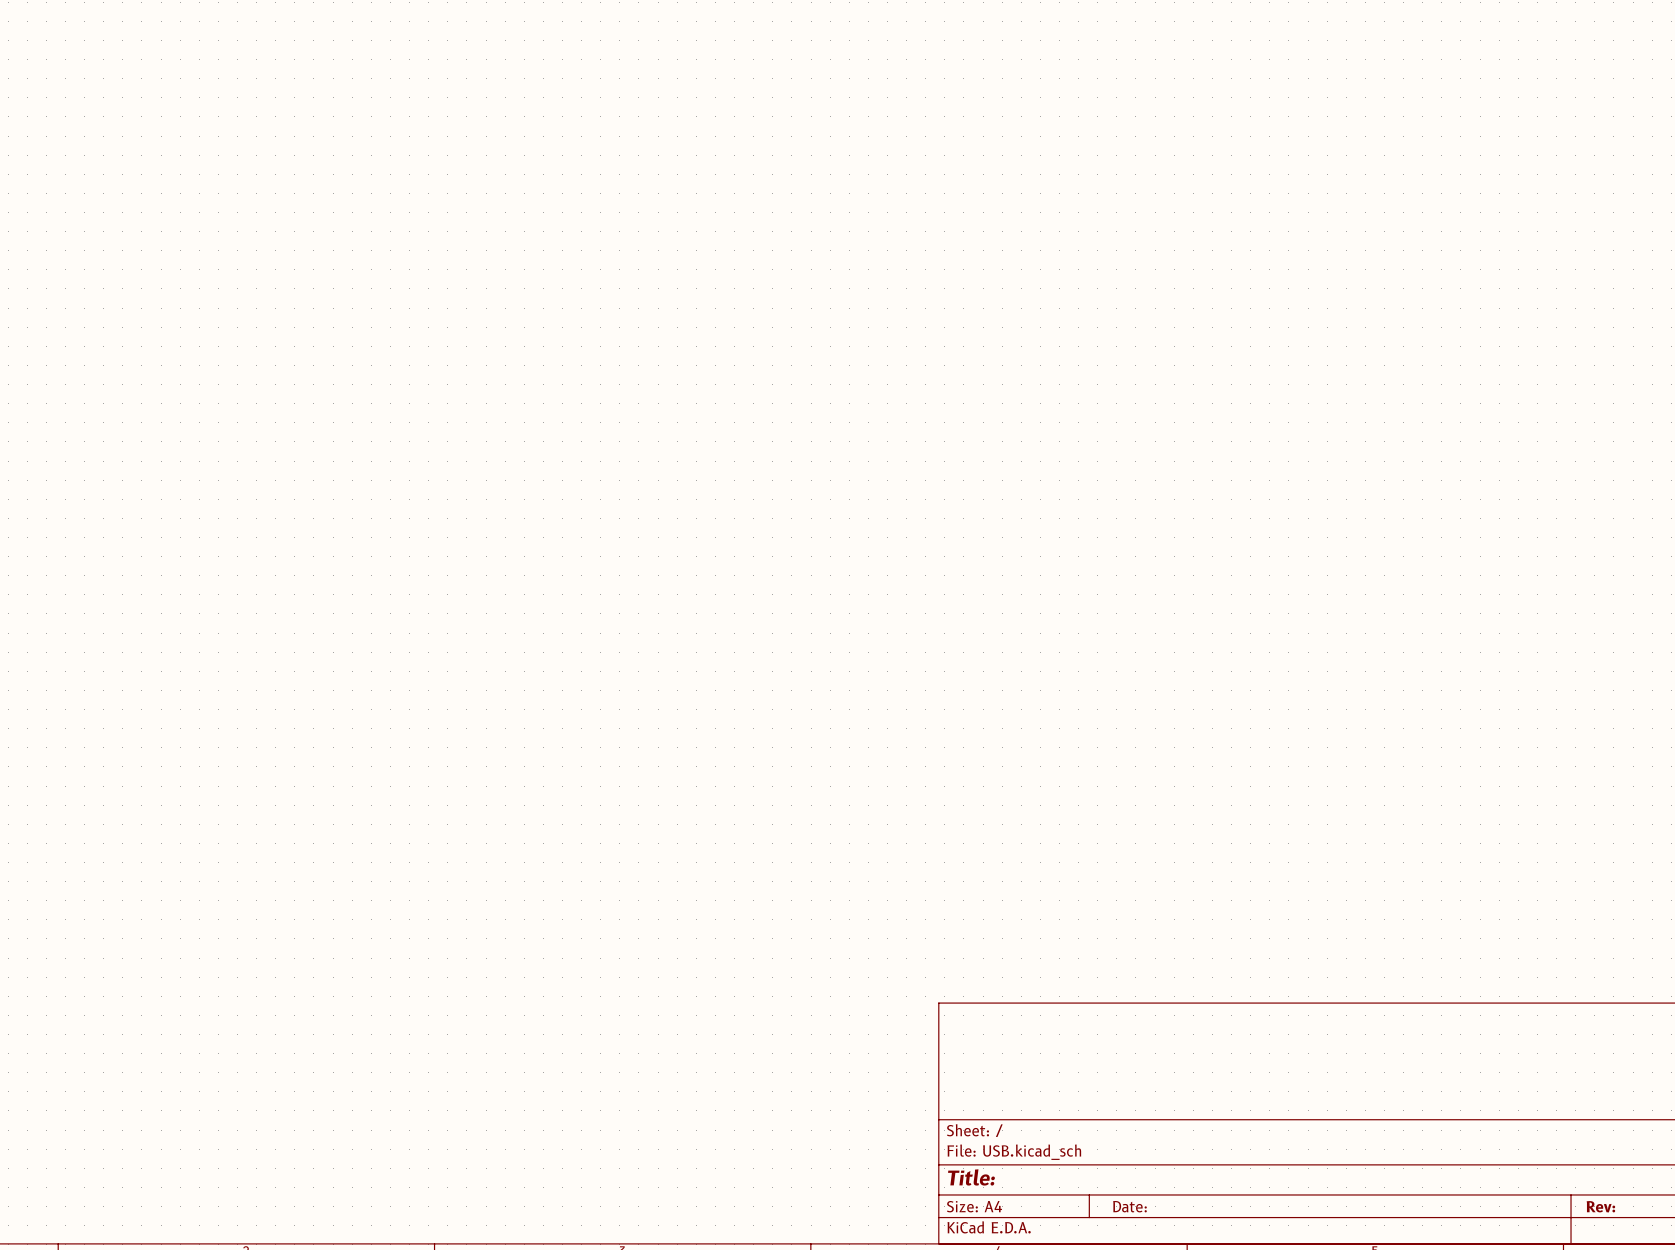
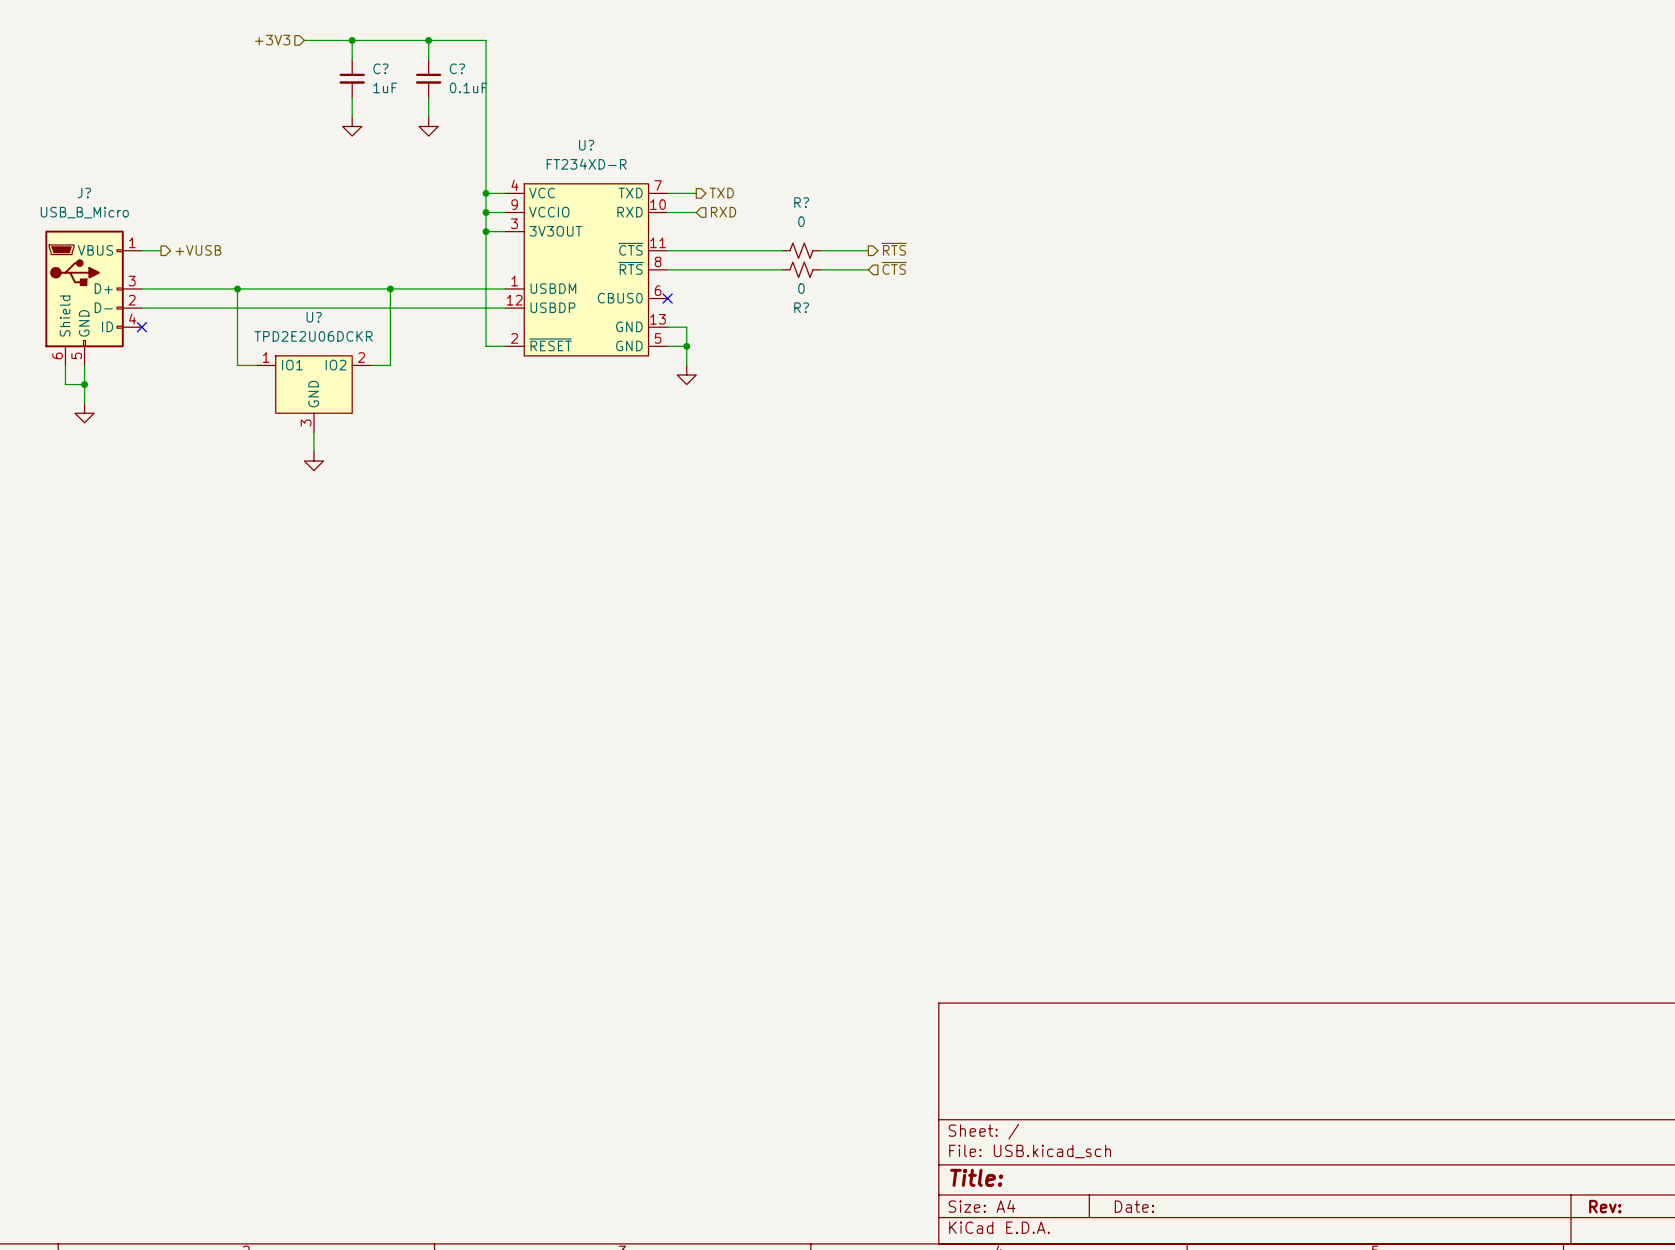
hierarchical label: none -> +3V3 (272, 40)
wire: none -> (304, 40) (486, 40) (486, 346) (505, 346)
wire: none -> (352, 40) (352, 59)
junction: none -> (352, 40)
wire: none -> (428, 40) (428, 59)
junction: none -> (428, 40)
C?: none -> 1uF (352, 78)
C?: none -> 0.1uF (428, 78)
wire: none -> (352, 97) (352, 116)
wire: none -> (428, 97) (428, 116)
power symbol: none -> (352, 126)
power symbol: none -> (428, 126)
wire: none -> (486, 193) (505, 193)
junction: none -> (486, 193)
wire: none -> (667, 193) (696, 193)
hierarchical label: none -> TXD (721, 193)
wire: none -> (486, 212) (505, 212)
junction: none -> (486, 212)
wire: none -> (667, 212) (696, 212)
hierarchical label: none -> RXD (723, 212)
wire: none -> (486, 231) (505, 231)
junction: none -> (486, 231)
hierarchical label: none -> ~{RTS} (894, 249)
wire: none -> (141, 250) (161, 250)
hierarchical label: none -> +VUSB (198, 250)
wire: none -> (667, 250) (782, 250)
R?: none -> 0 (801, 250)
wire: none -> (820, 250) (868, 250)
hierarchical label: none -> ~{CTS} (894, 268)
U?: none -> FT234XD-R (586, 269)
wire: none -> (667, 269) (782, 269)
R?: none -> 0 (801, 269)
wire: none -> (820, 269) (868, 269)
wire: none -> (141, 288) (505, 288)
wire: none -> (237, 288) (237, 365) (256, 365)
junction: none -> (237, 288)
wire: none -> (390, 288) (390, 365) (371, 365)
junction: none -> (390, 288)
J?: none -> USB_B_Micro (93, 298)
no-connect mark: none -> (667, 298)
wire: none -> (141, 308) (505, 308)
no-connect mark: none -> (141, 327)
wire: none -> (667, 327) (686, 327) (686, 365)
wire: none -> (667, 346) (686, 346)
junction: none -> (686, 346)
wire: none -> (65, 365) (65, 384) (84, 384)
wire: none -> (84, 365) (84, 403)
power symbol: none -> (686, 374)
junction: none -> (84, 384)
U?: none -> TPD2E2U06DCKR (313, 394)
power symbol: none -> (84, 413)
wire: none -> (313, 432) (313, 451)
power symbol: none -> (313, 461)

